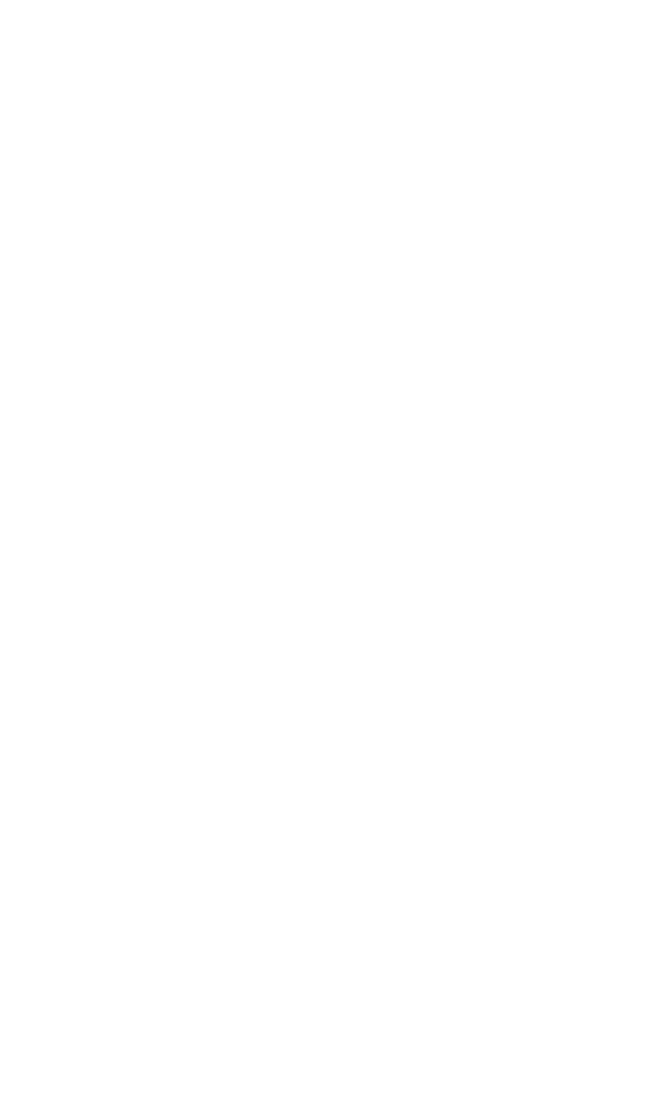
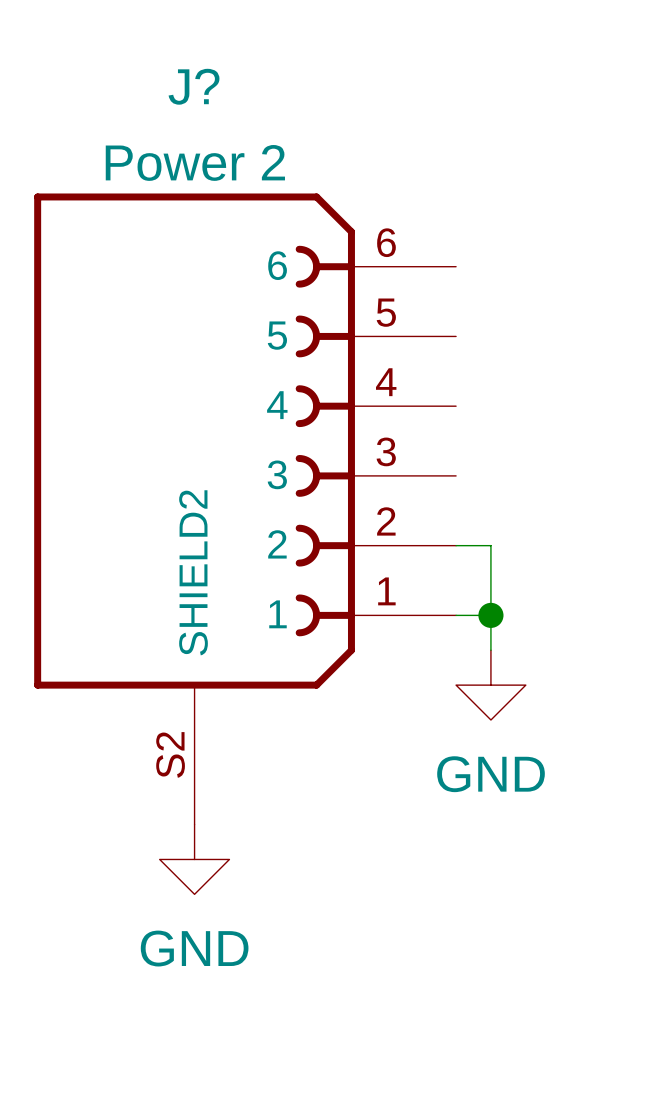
J?: none -> Power 2 (245, 509)
wire: none -> (456, 545) (490, 545) (490, 650)
wire: none -> (456, 615) (490, 615)
junction: none -> (490, 615)
power symbol: none -> GND (490, 685)
power symbol: none -> GND (194, 859)

